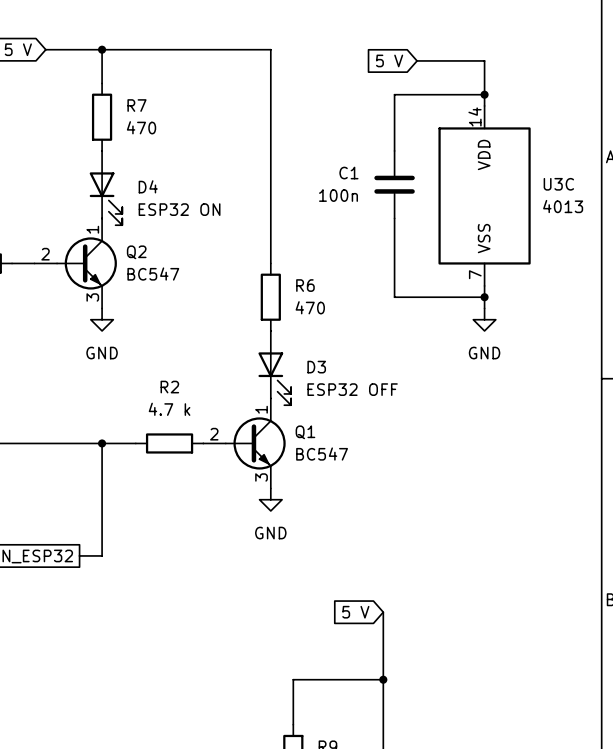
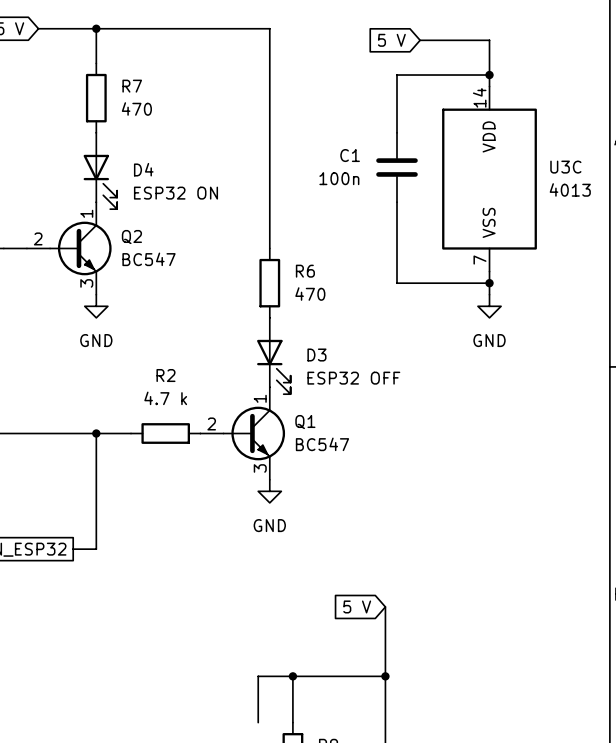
wire: none -> (292, 676) (258, 676) (258, 722)
junction: none -> (292, 676)

